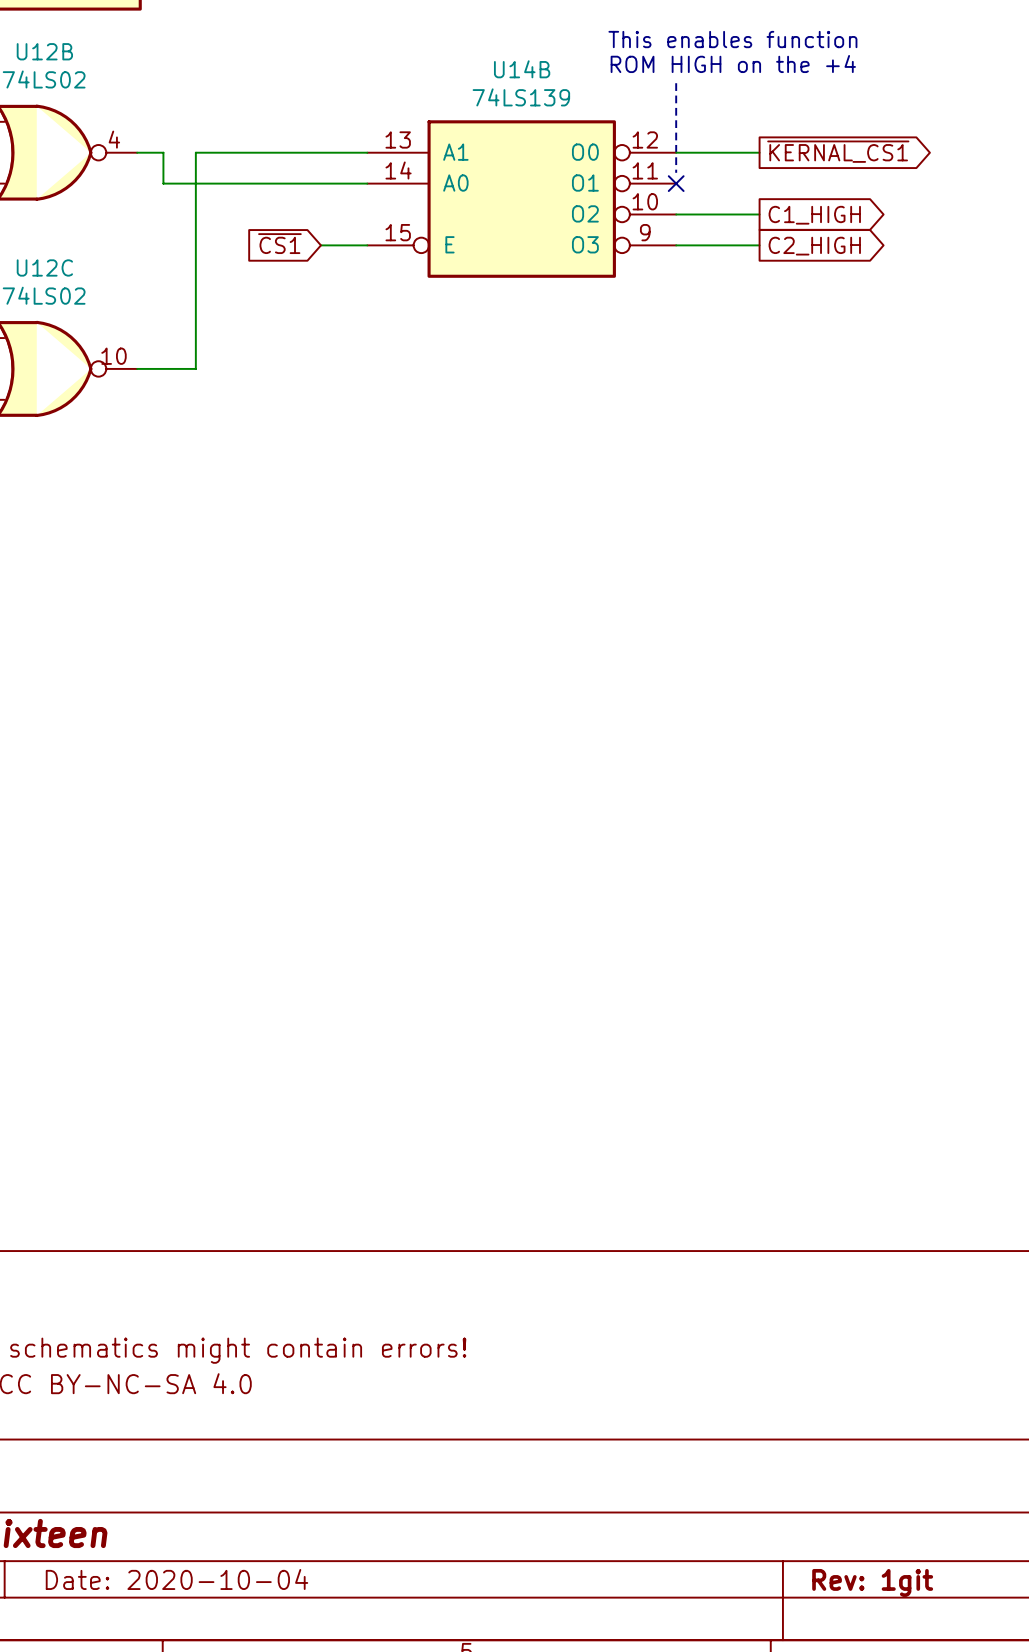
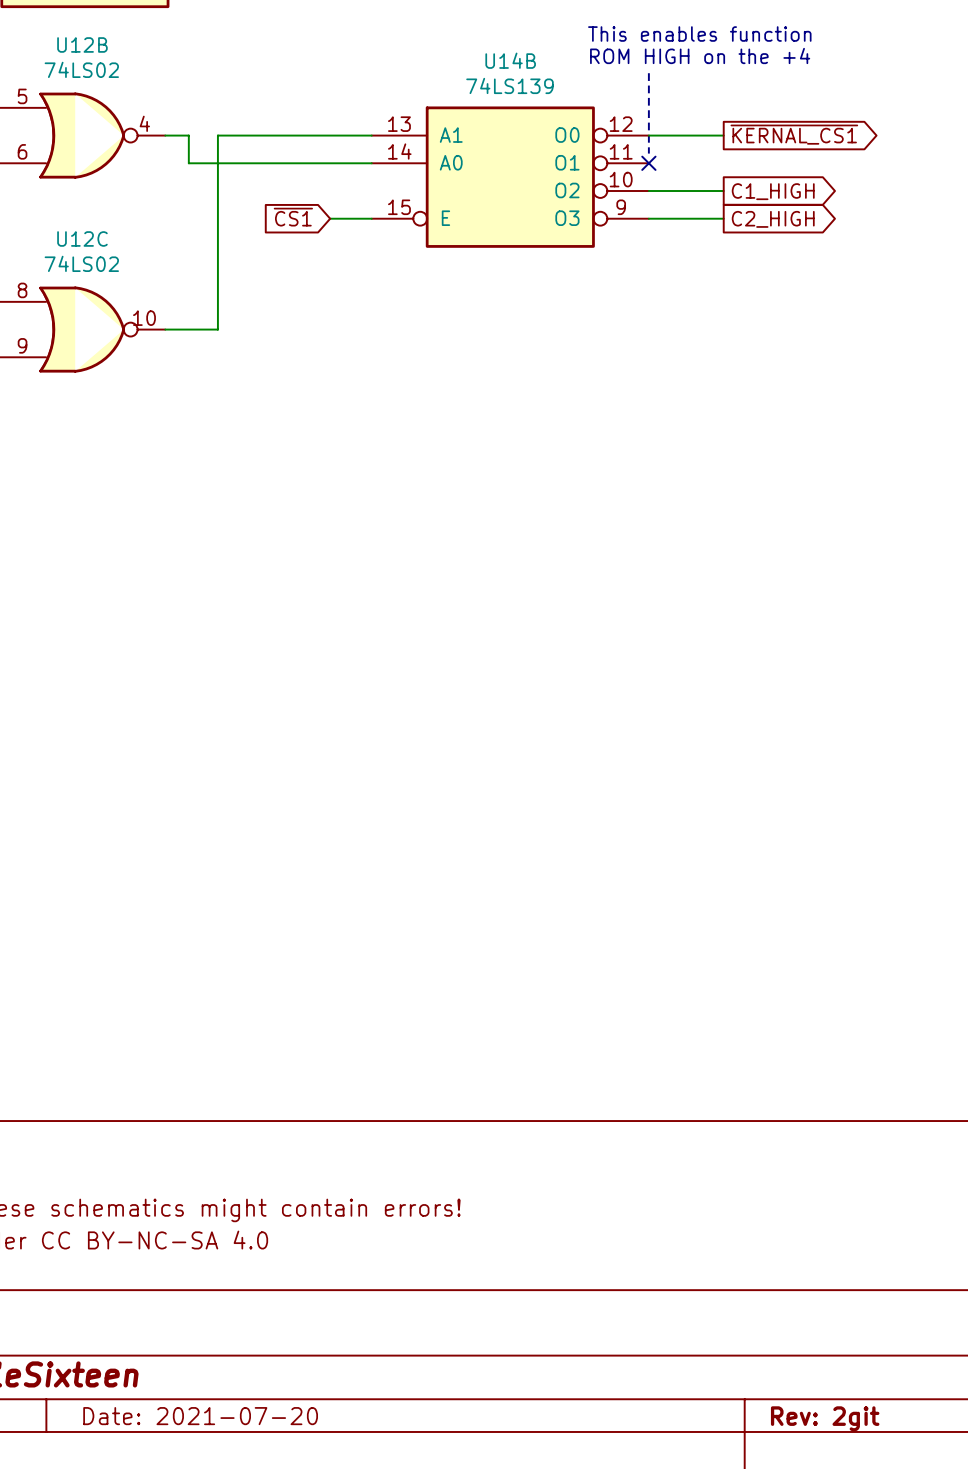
title block: Date: 2020-10-04 (176, 1579) -> Date: 2021-07-20 (200, 1416)
title block: Rev: 1git (872, 1582) -> Rev: 2git (825, 1418)

